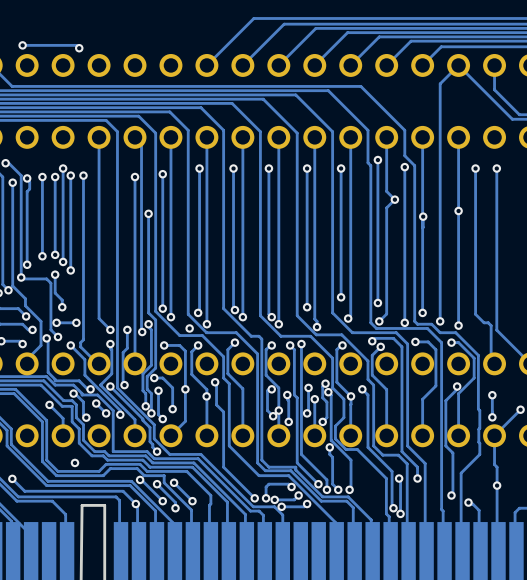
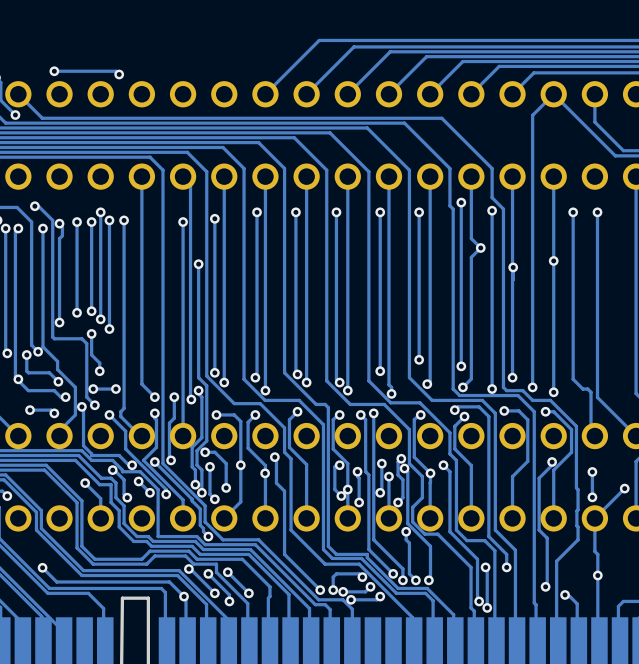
via: (21, 277) -> none
via: (189, 328) -> none
via: (75, 462) -> none

